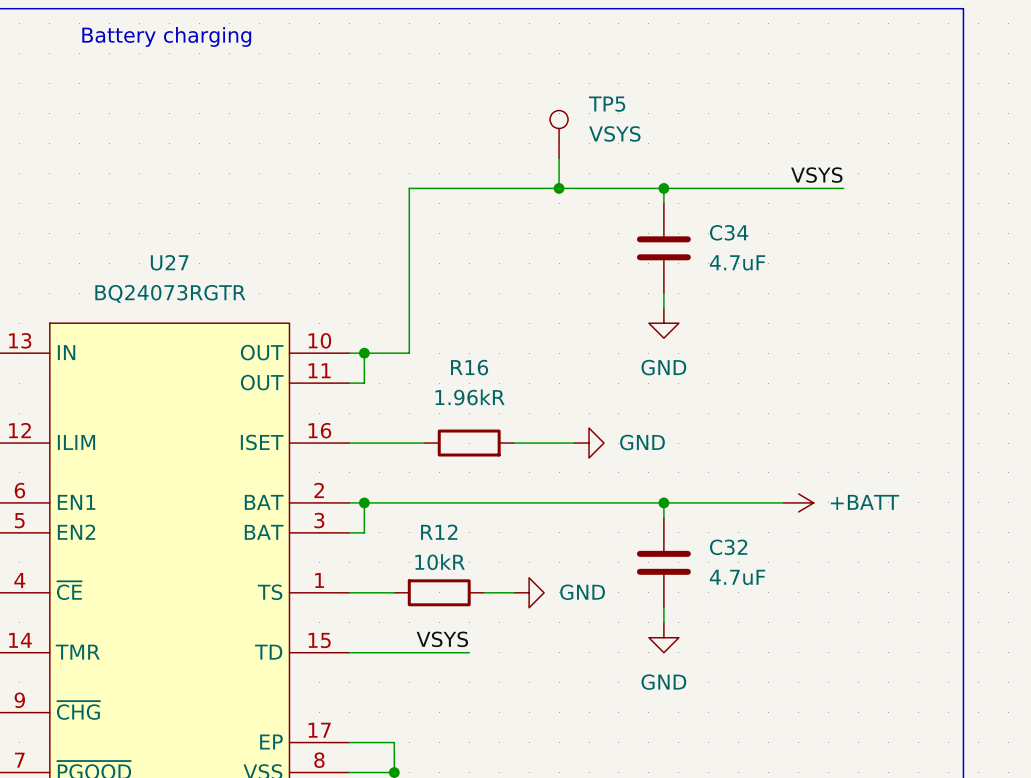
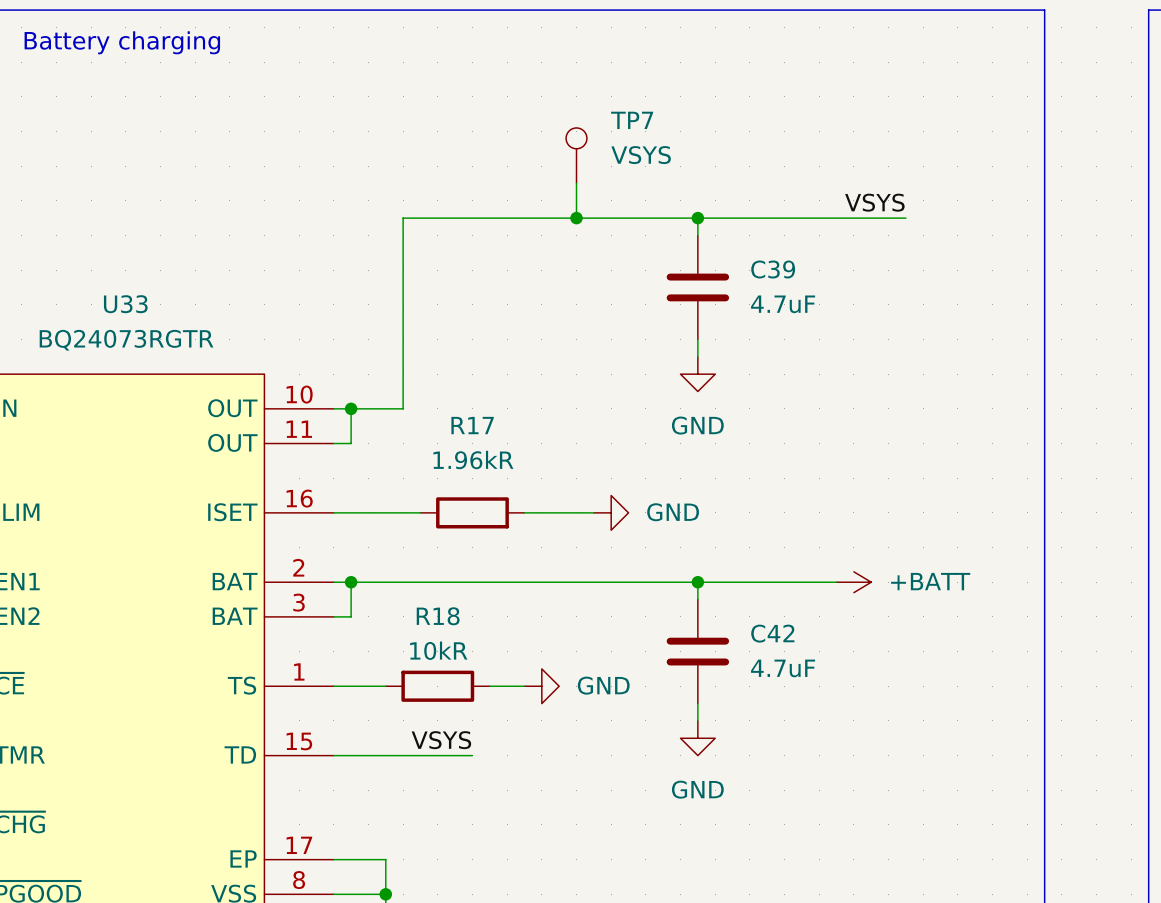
TP5 name: TP5 (607, 104) -> TP7 (632, 120)
C34 name: C34 (729, 232) -> C39 (773, 269)
U27 name: U27 (169, 262) -> U33 (125, 304)
R16 name: R16 (469, 367) -> R17 (472, 425)
R12 name: R12 (439, 532) -> R18 (438, 616)
C32 name: C32 (728, 547) -> C42 (772, 633)

